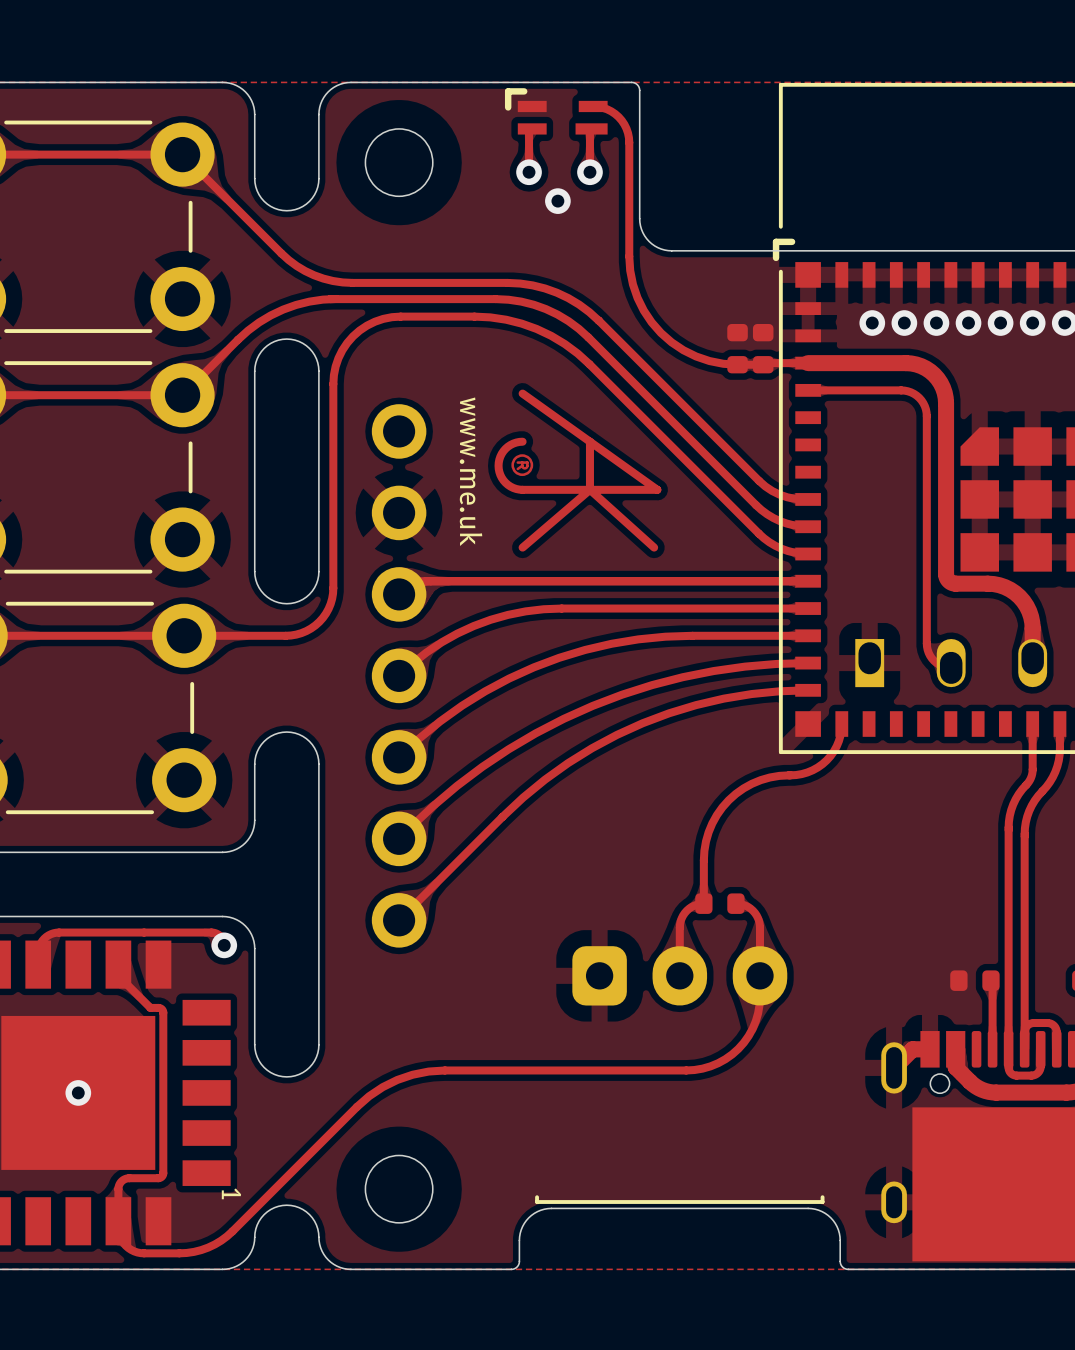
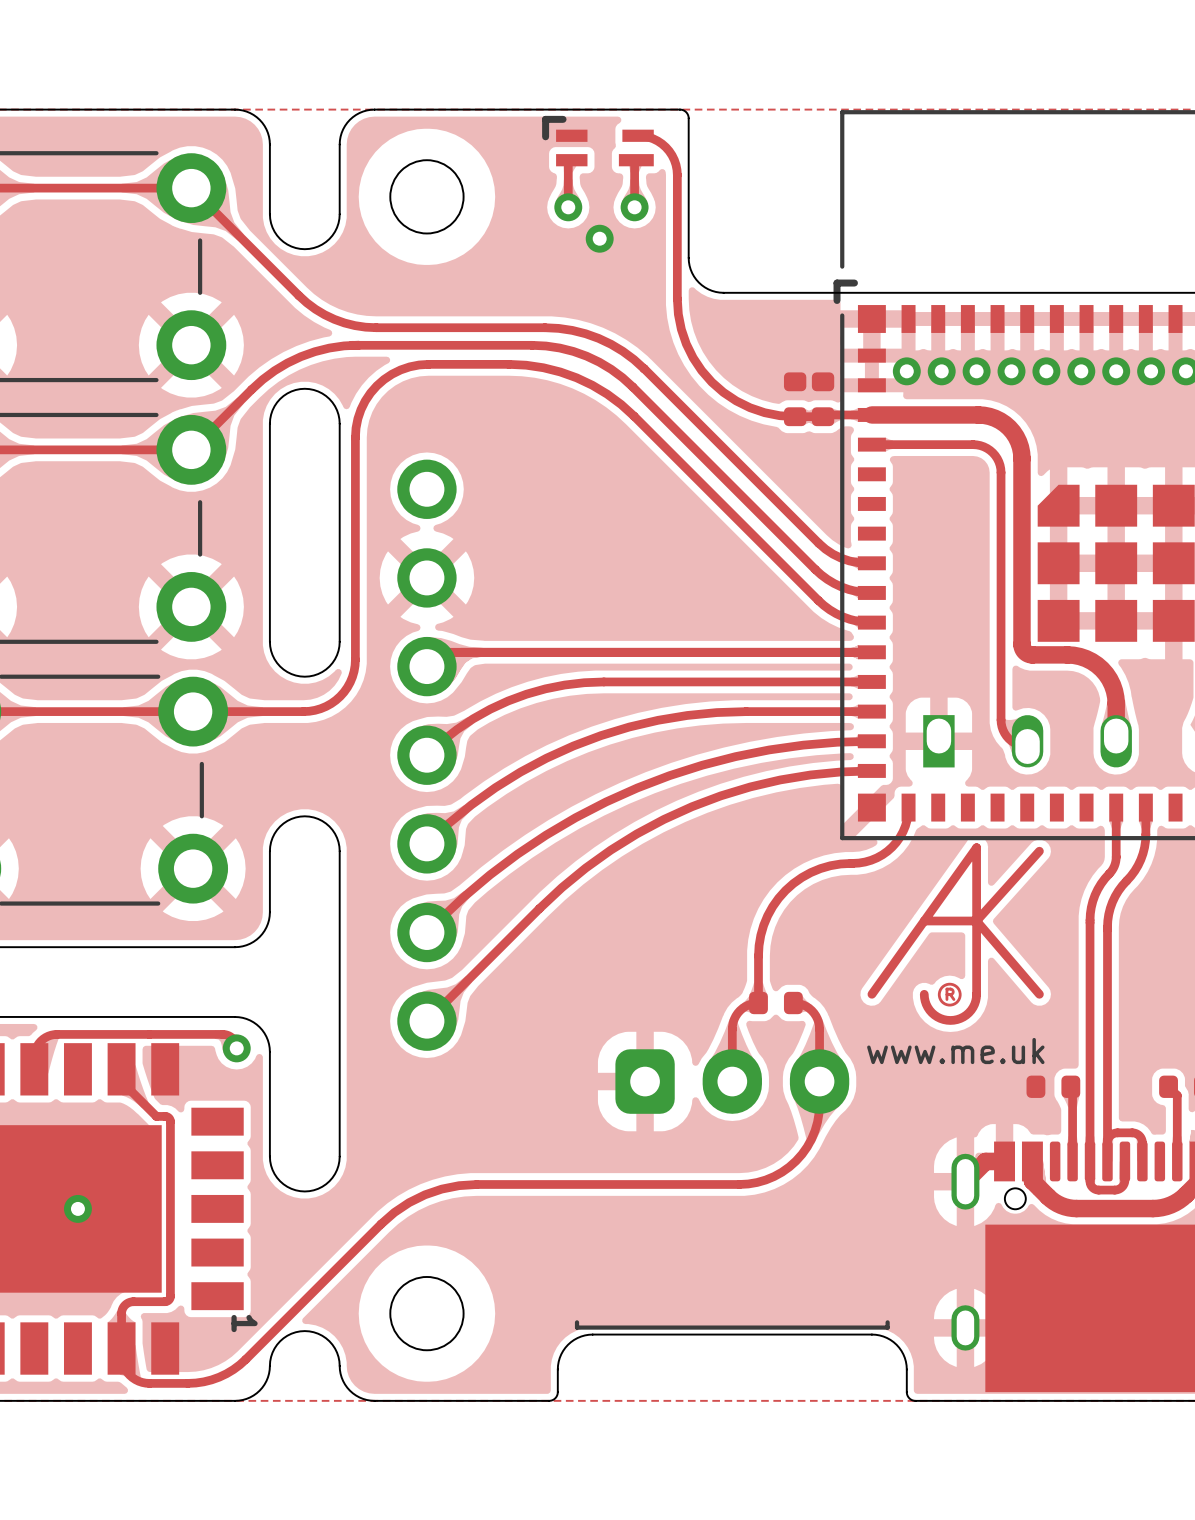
via: none -> (906, 371)
drawing: [494, 389, 662, 552] -> none
drawing: none -> [867, 843, 1044, 1025]

